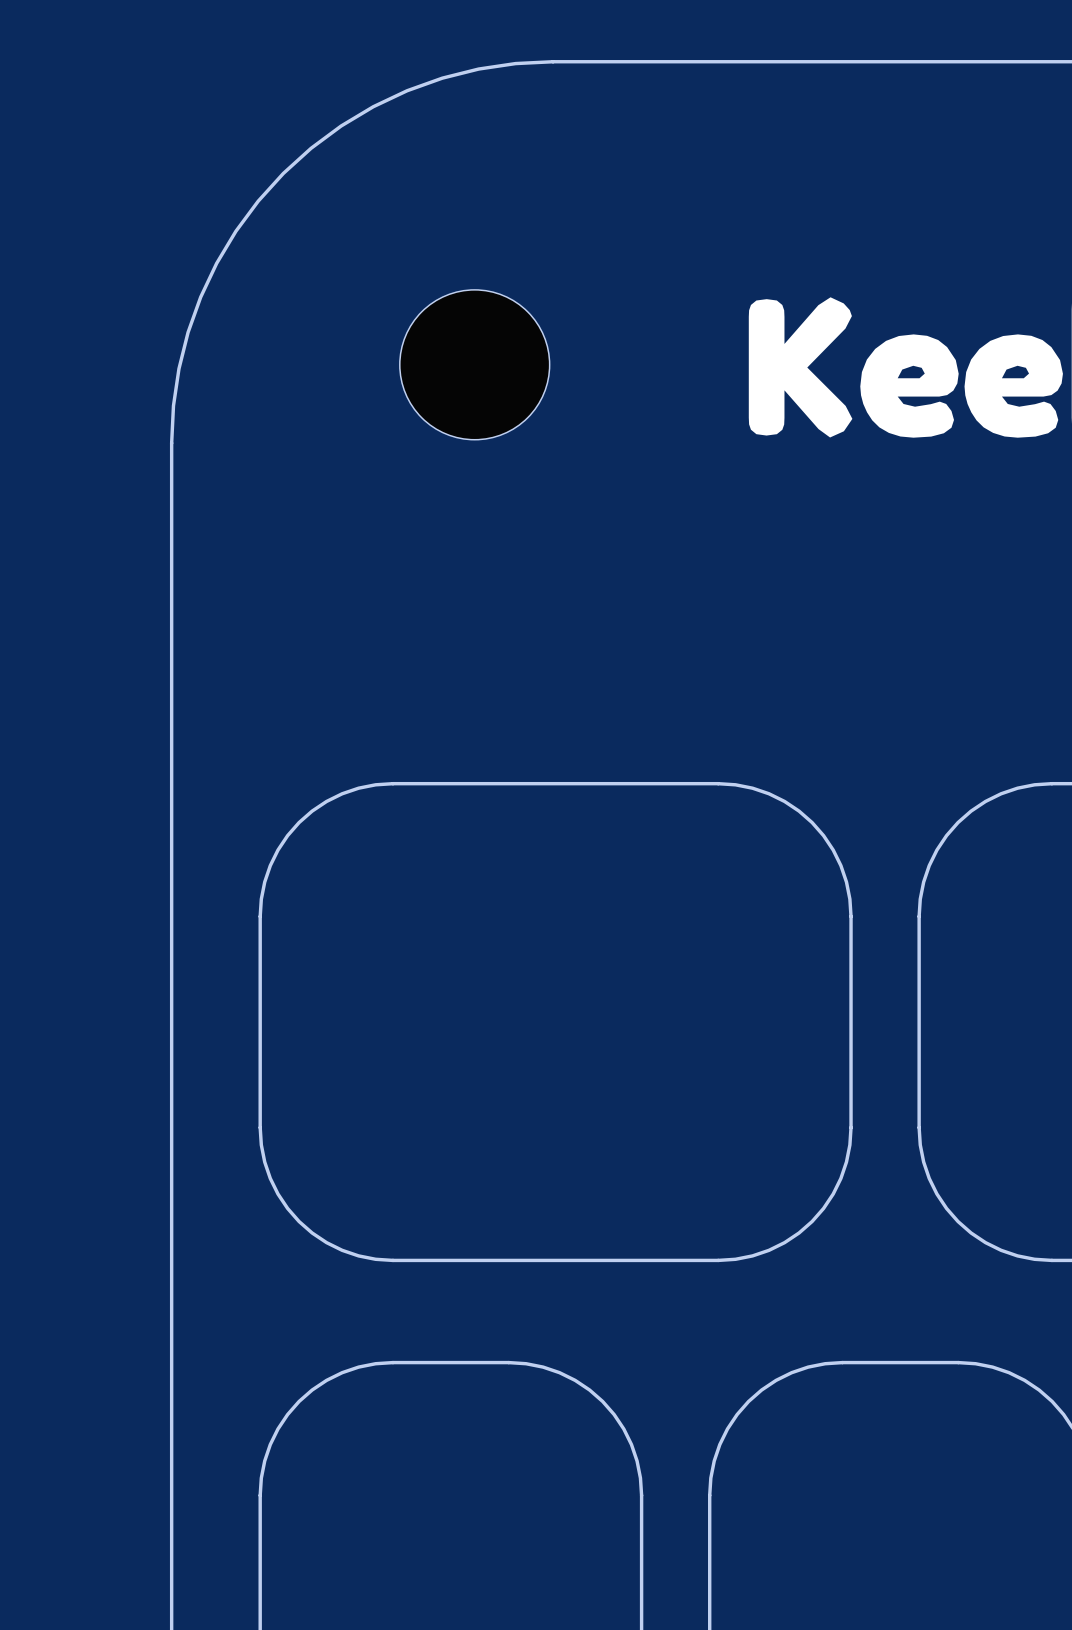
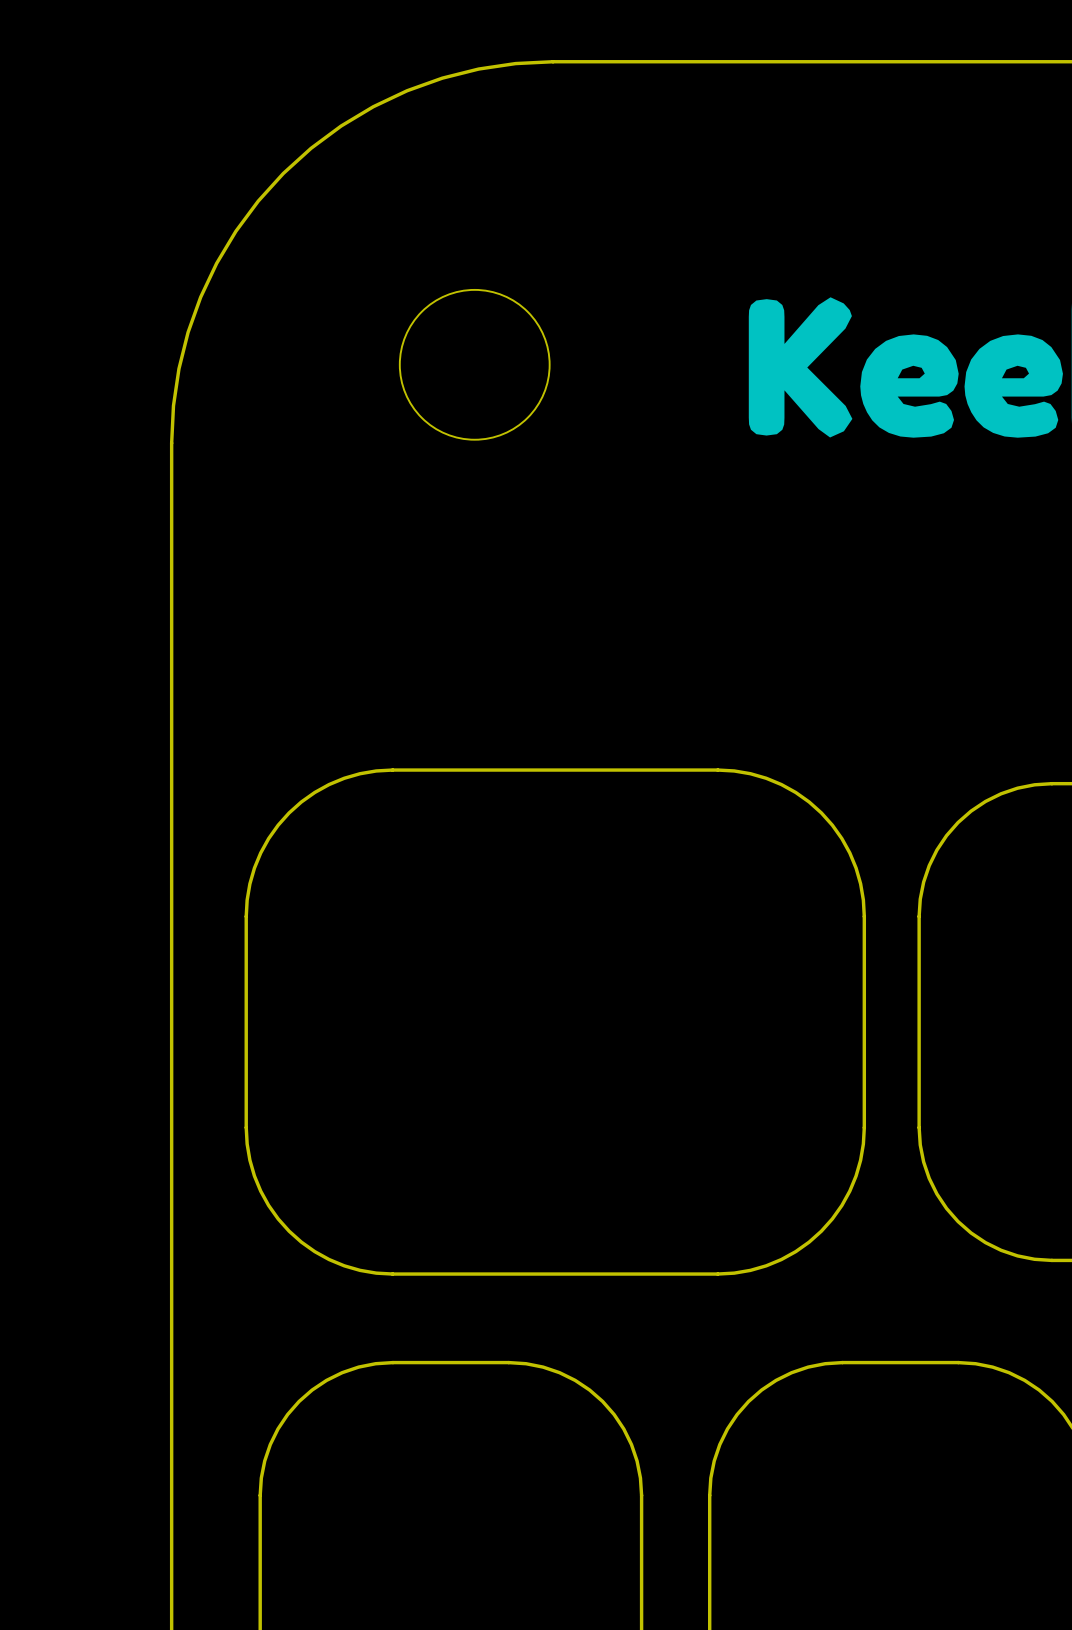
board edge: (393, 783) (735, 784) (769, 793) (799, 811) (812, 822) (823, 835) (840, 865) (849, 899) (851, 916) (849, 1144) (846, 1161) (833, 1194) (812, 1221) (799, 1232) (769, 1250) (752, 1255) (718, 1260) (375, 1259) (358, 1255) (326, 1242) (299, 1221) (277, 1194) (270, 1178) (261, 1144) (260, 916) (264, 882) (277, 850) (287, 835) (312, 811) (326, 801) (358, 788) (393, 783) -> (392, 770) (376, 770) (344, 778) (314, 792) (301, 801) (278, 825) (268, 838) (260, 852) (249, 883) (246, 916) (247, 1144) (249, 1160) (260, 1191) (268, 1205) (289, 1231) (314, 1251) (329, 1259) (360, 1270) (392, 1274) (734, 1273) (750, 1270) (781, 1259) (795, 1251) (821, 1231) (841, 1205) (849, 1191) (860, 1160) (864, 1127) (863, 900) (860, 883) (849, 852) (832, 825) (821, 812) (795, 792) (781, 784) (766, 778) (734, 770) (392, 770)

